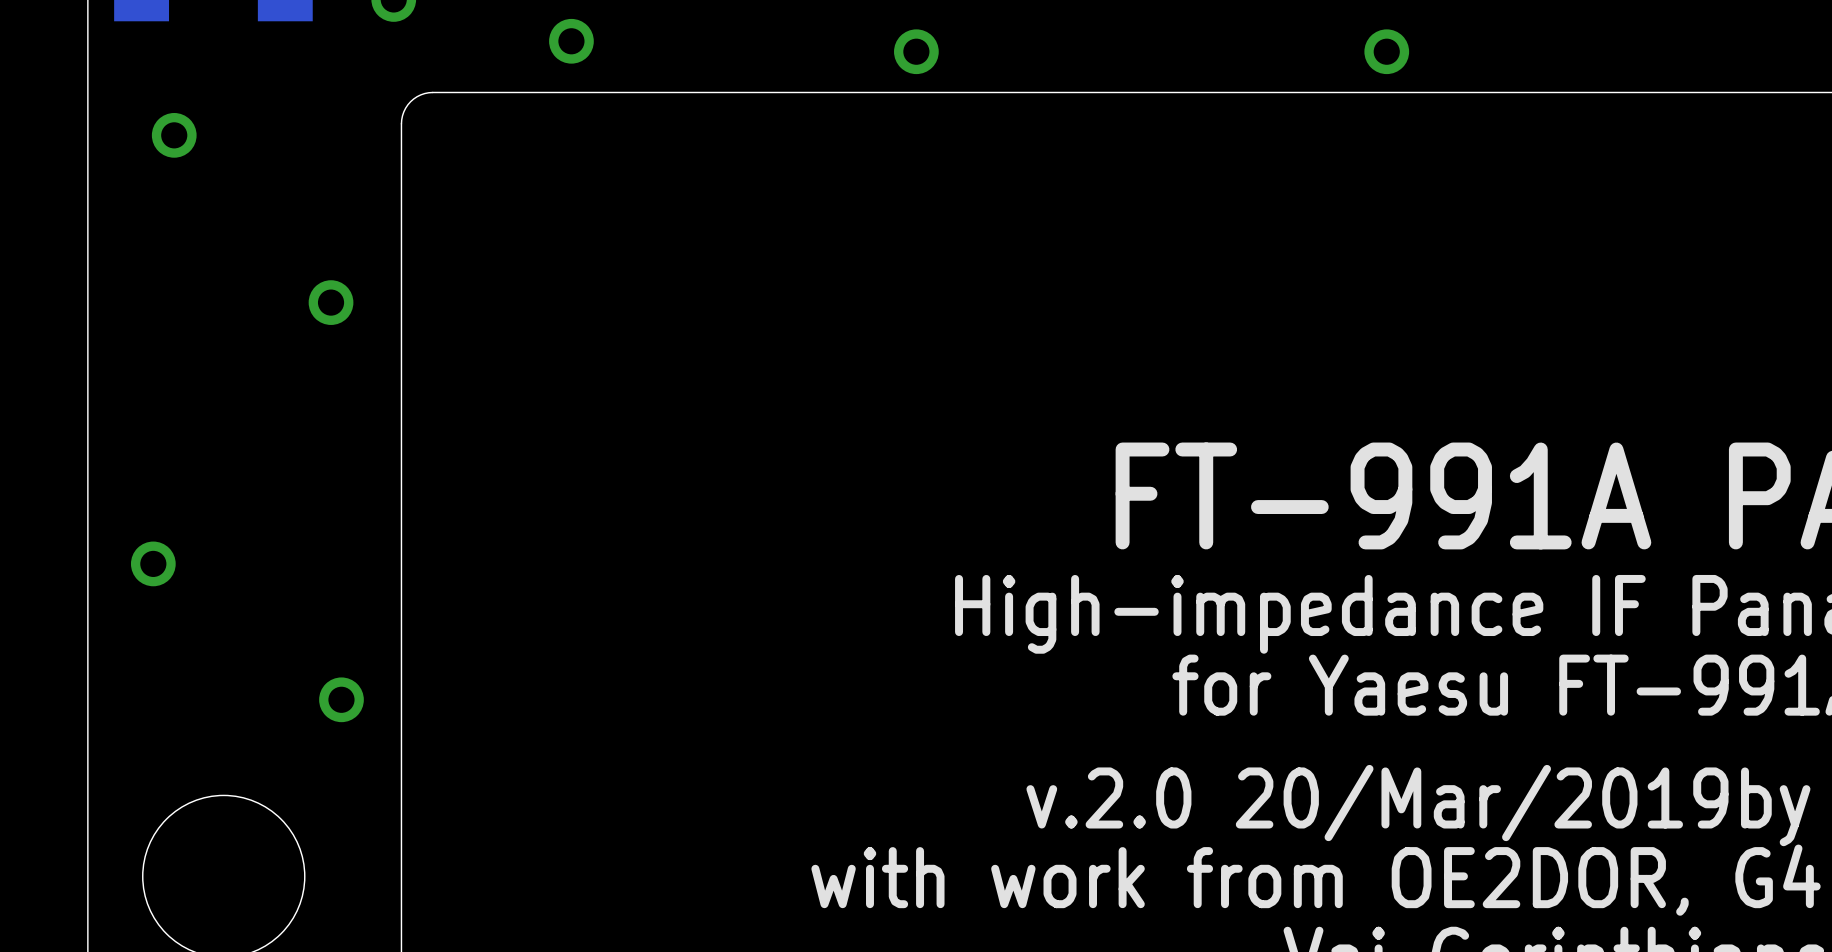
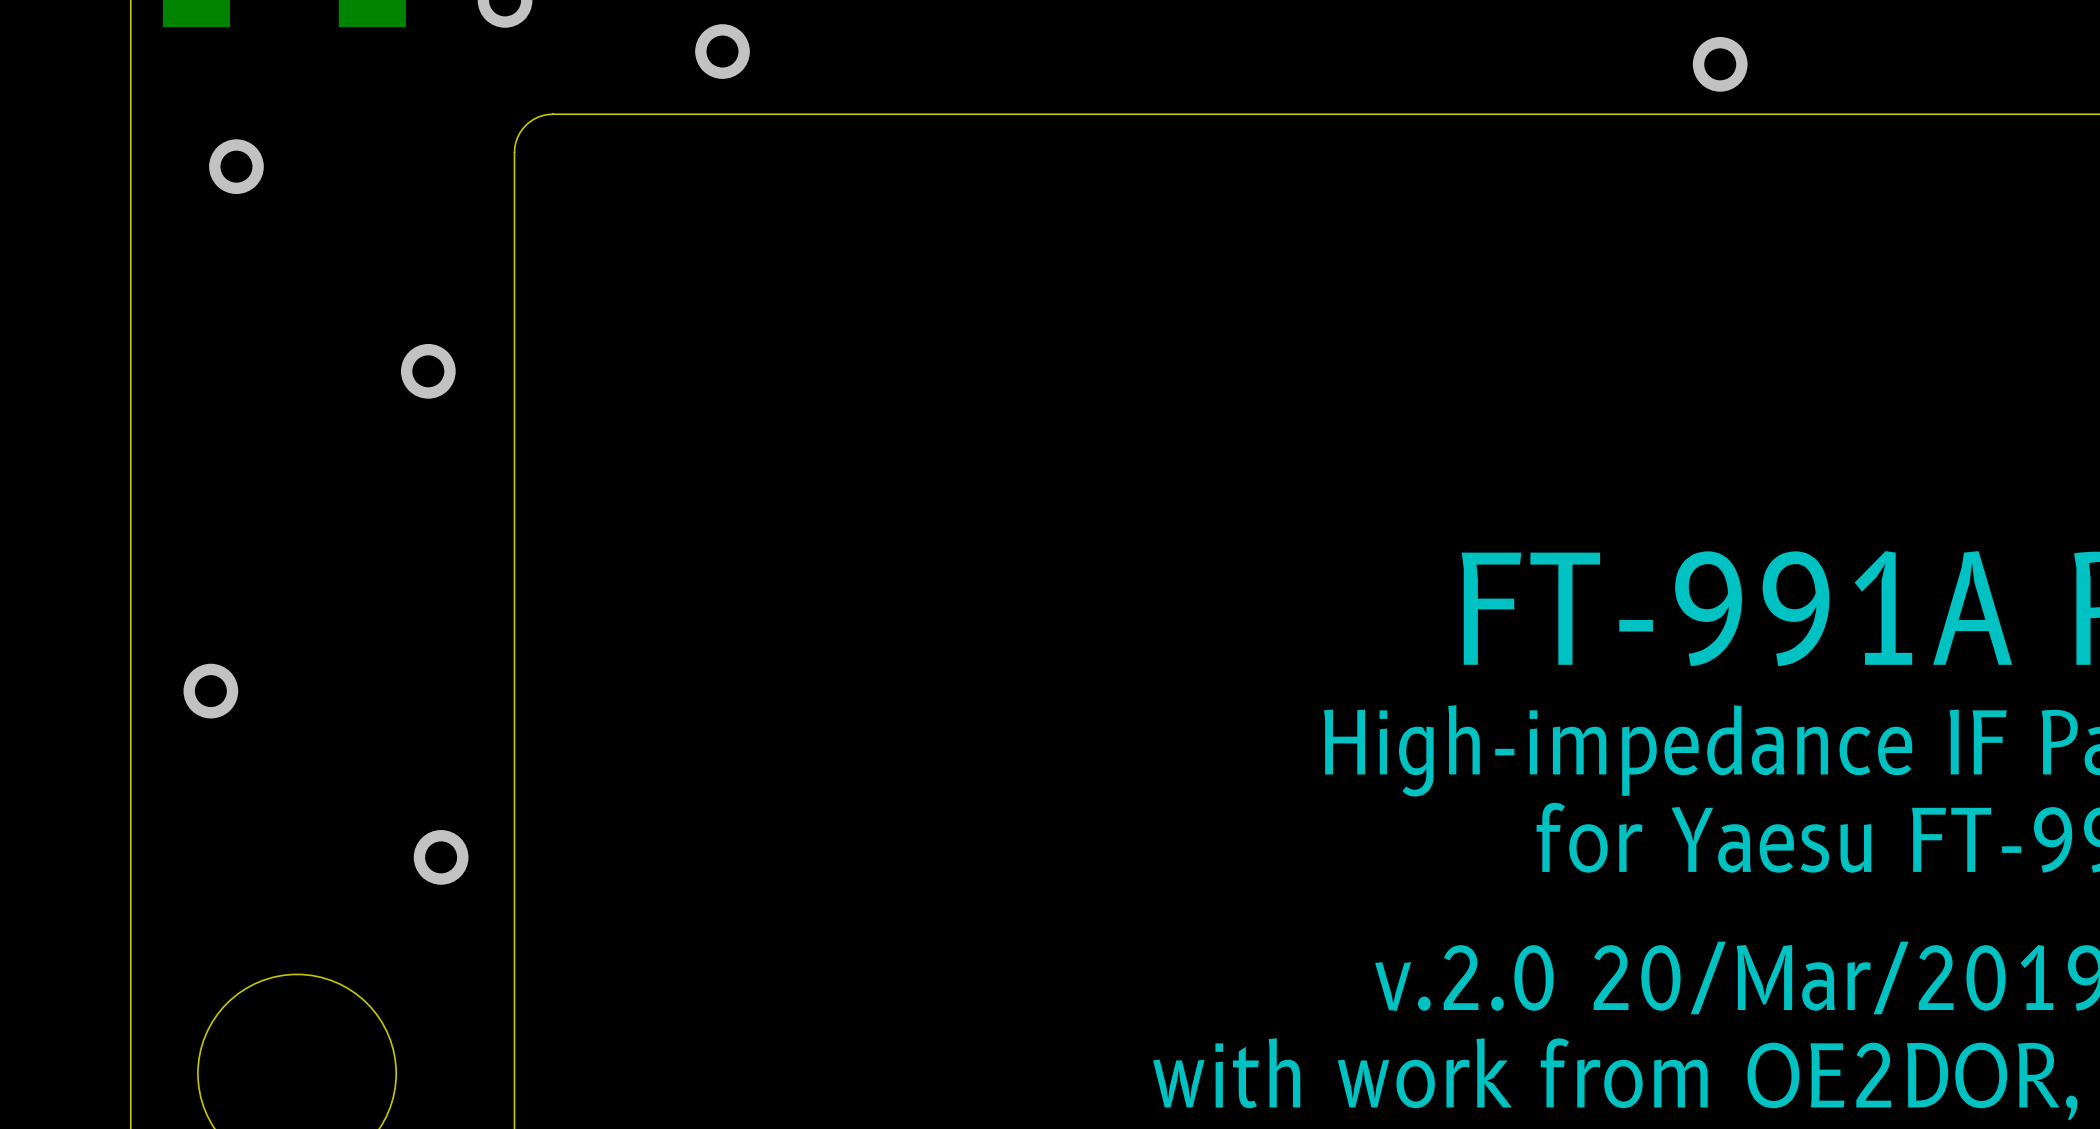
via: (916, 51) -> none

